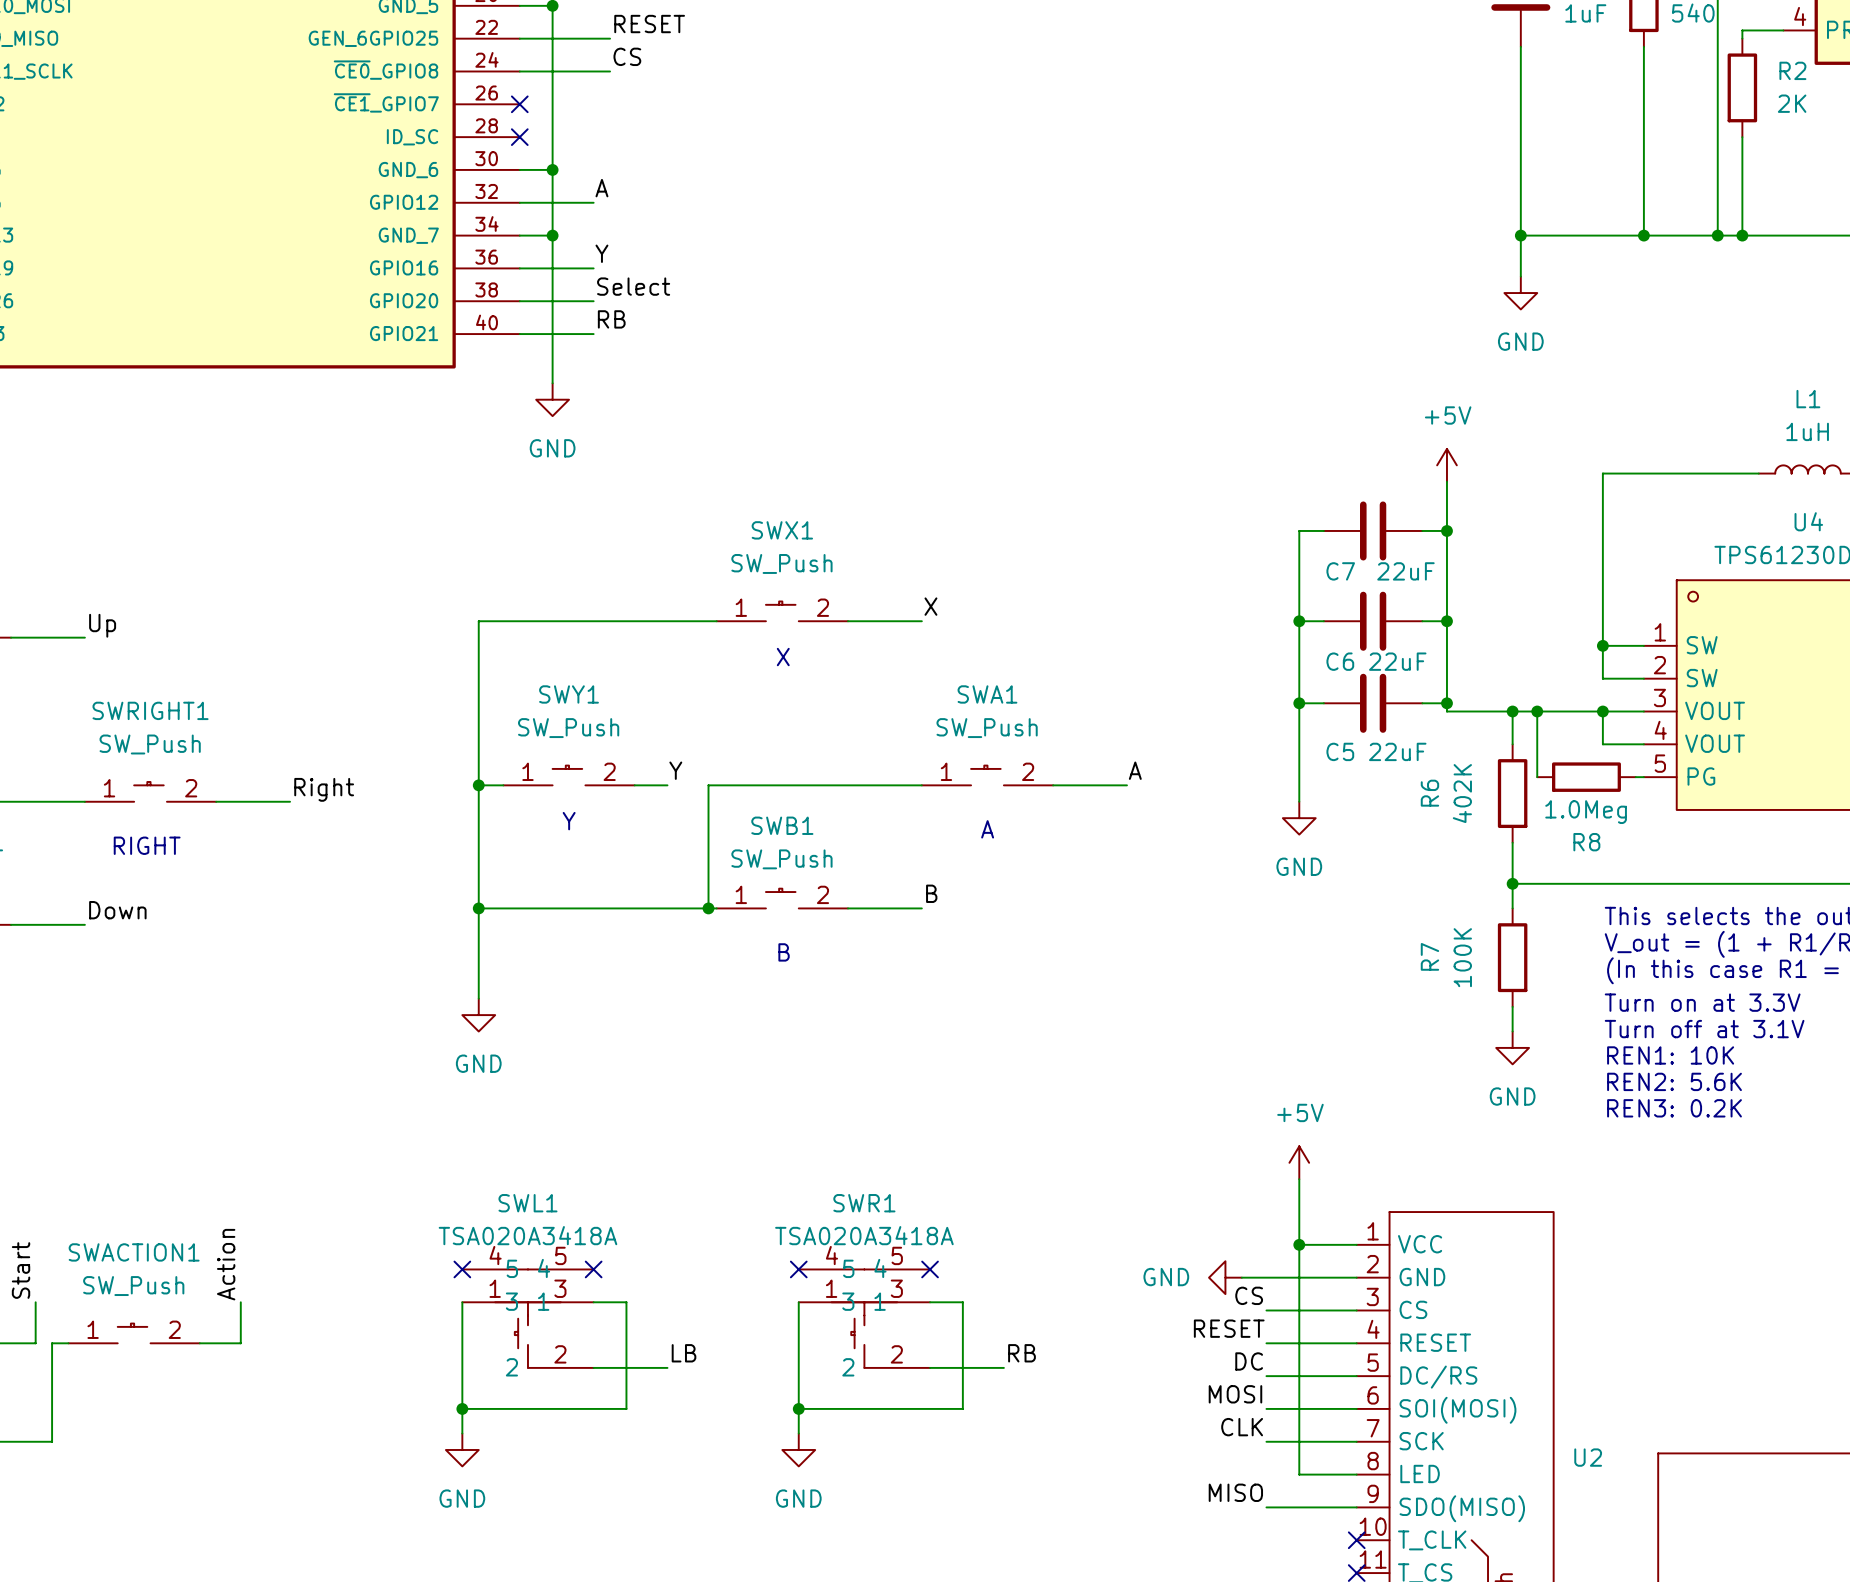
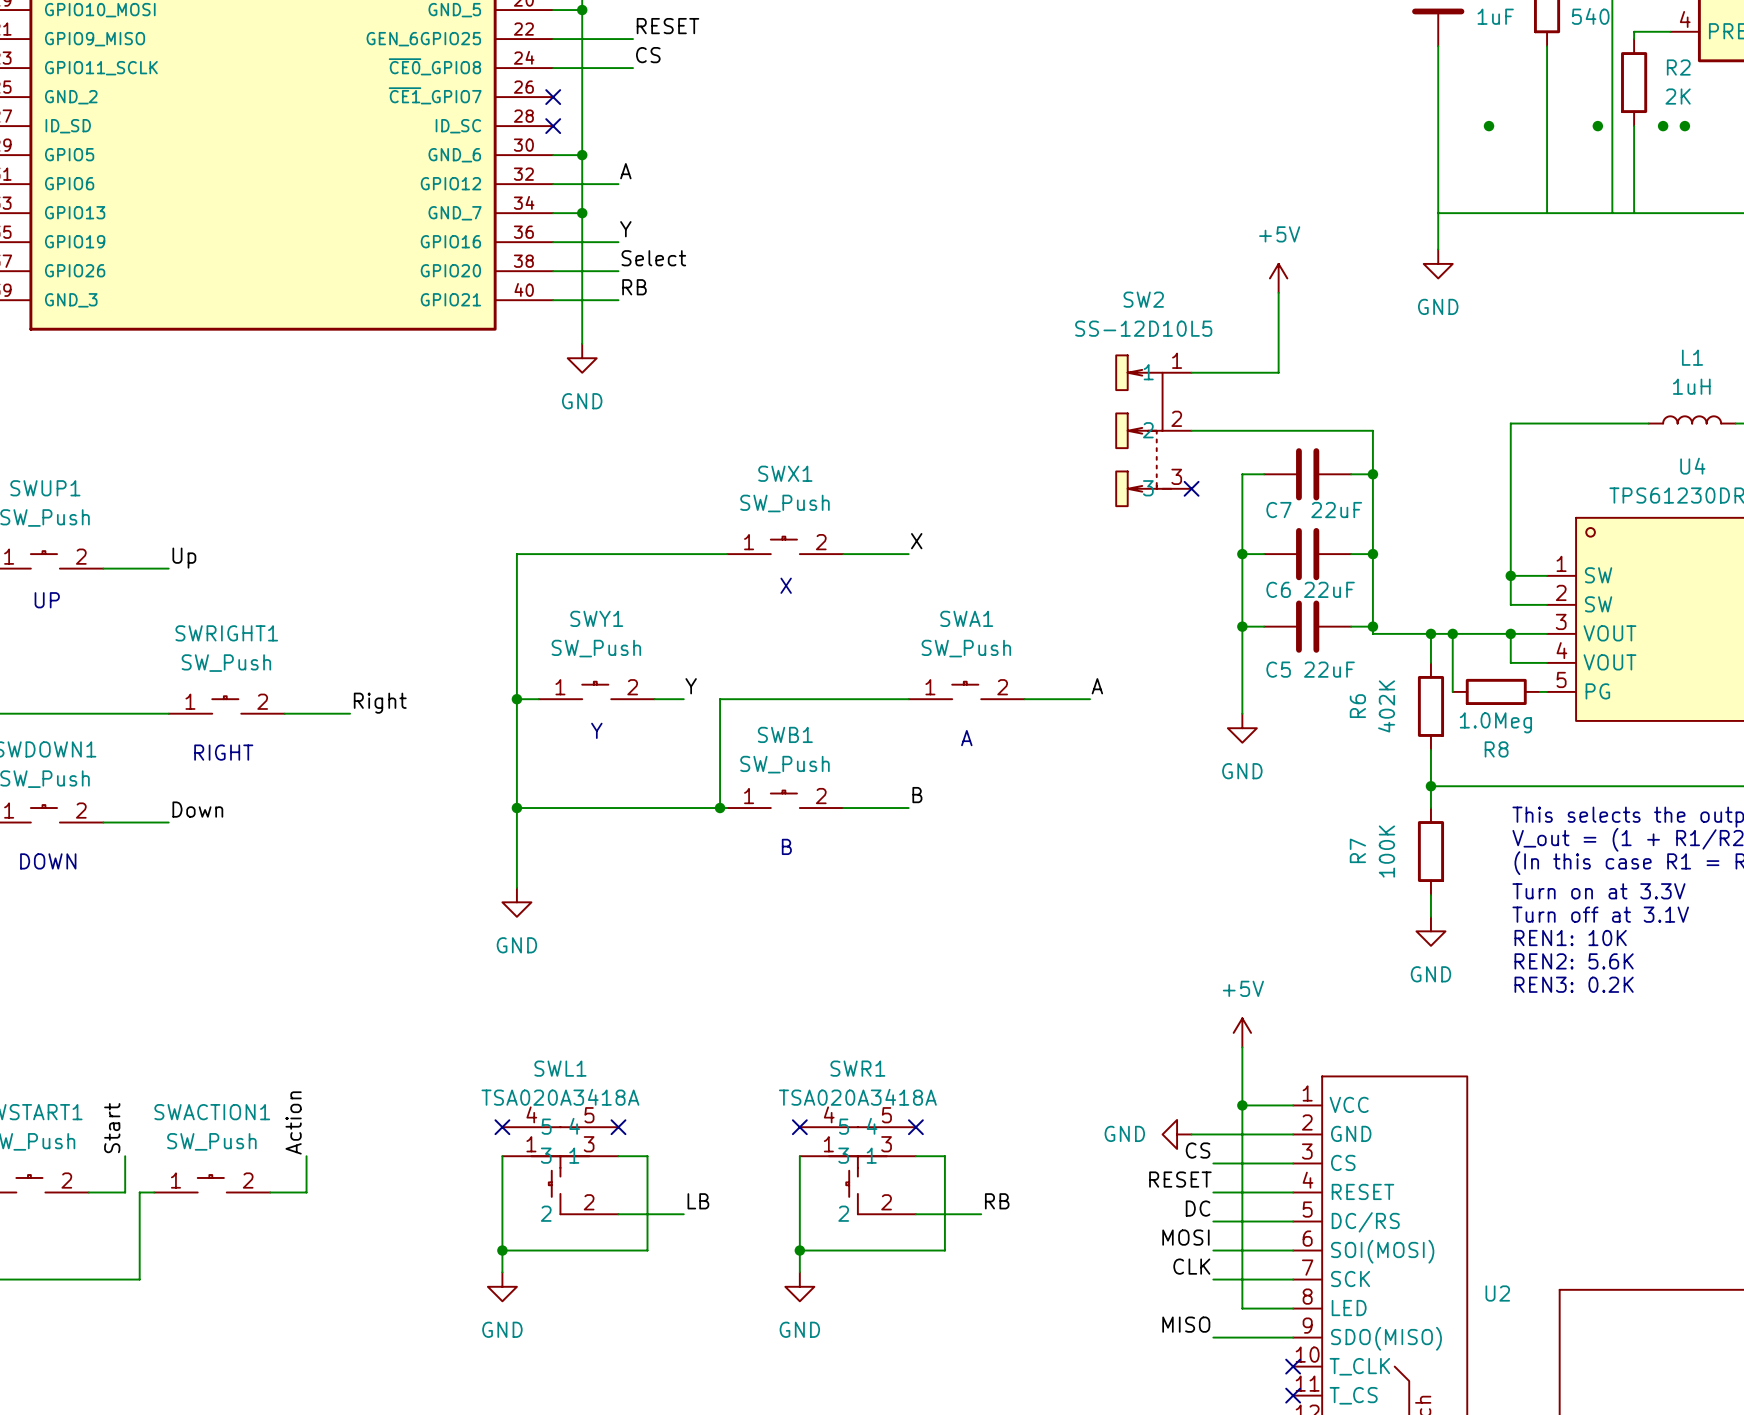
junction: none -> (1489, 126)
junction: none -> (1597, 126)
junction: none -> (1663, 126)
junction: none -> (1684, 126)
junction: (1520, 235) -> none
junction: (1643, 235) -> none
junction: (1717, 235) -> none
junction: (1742, 235) -> none
wire: none -> (1278, 292) (1278, 372) (1191, 372)
power symbol position: +5V (1446, 465) -> +5V (1278, 278)
SW2: none -> SS-12D10L5 (1153, 430)
wire: none -> (1191, 430) (1372, 430)
no-connect mark: none -> (1191, 488)

